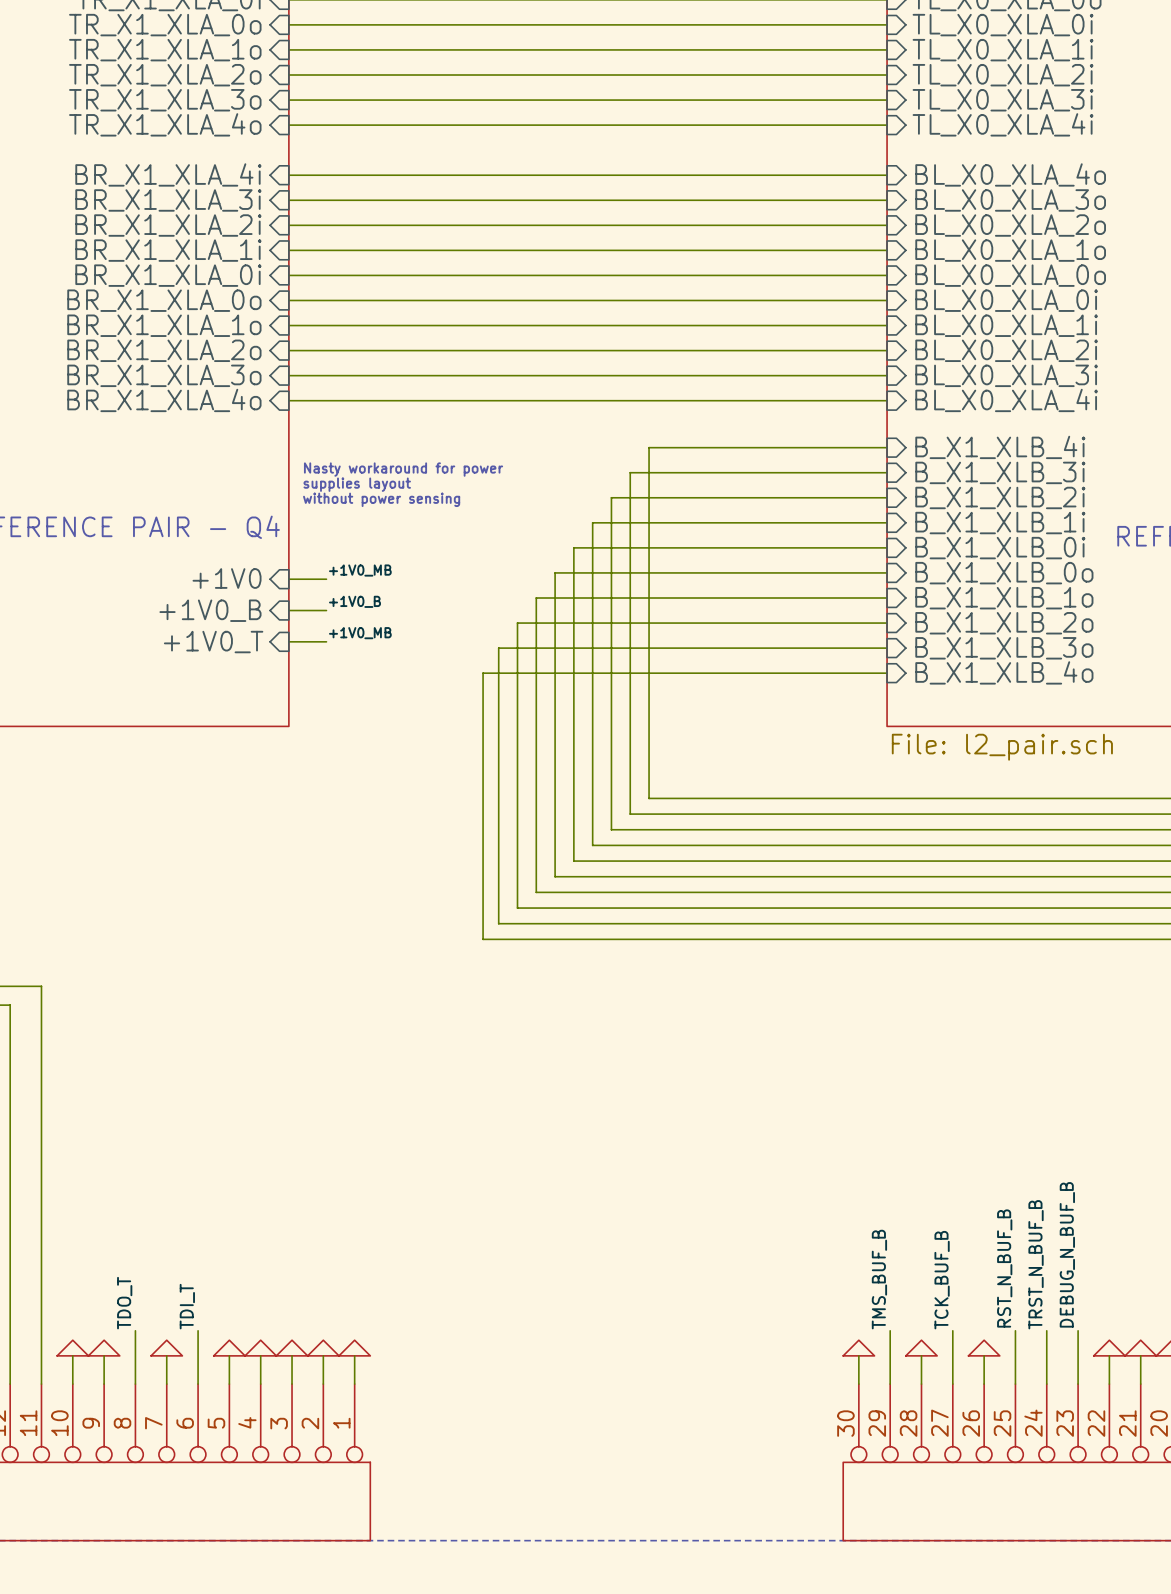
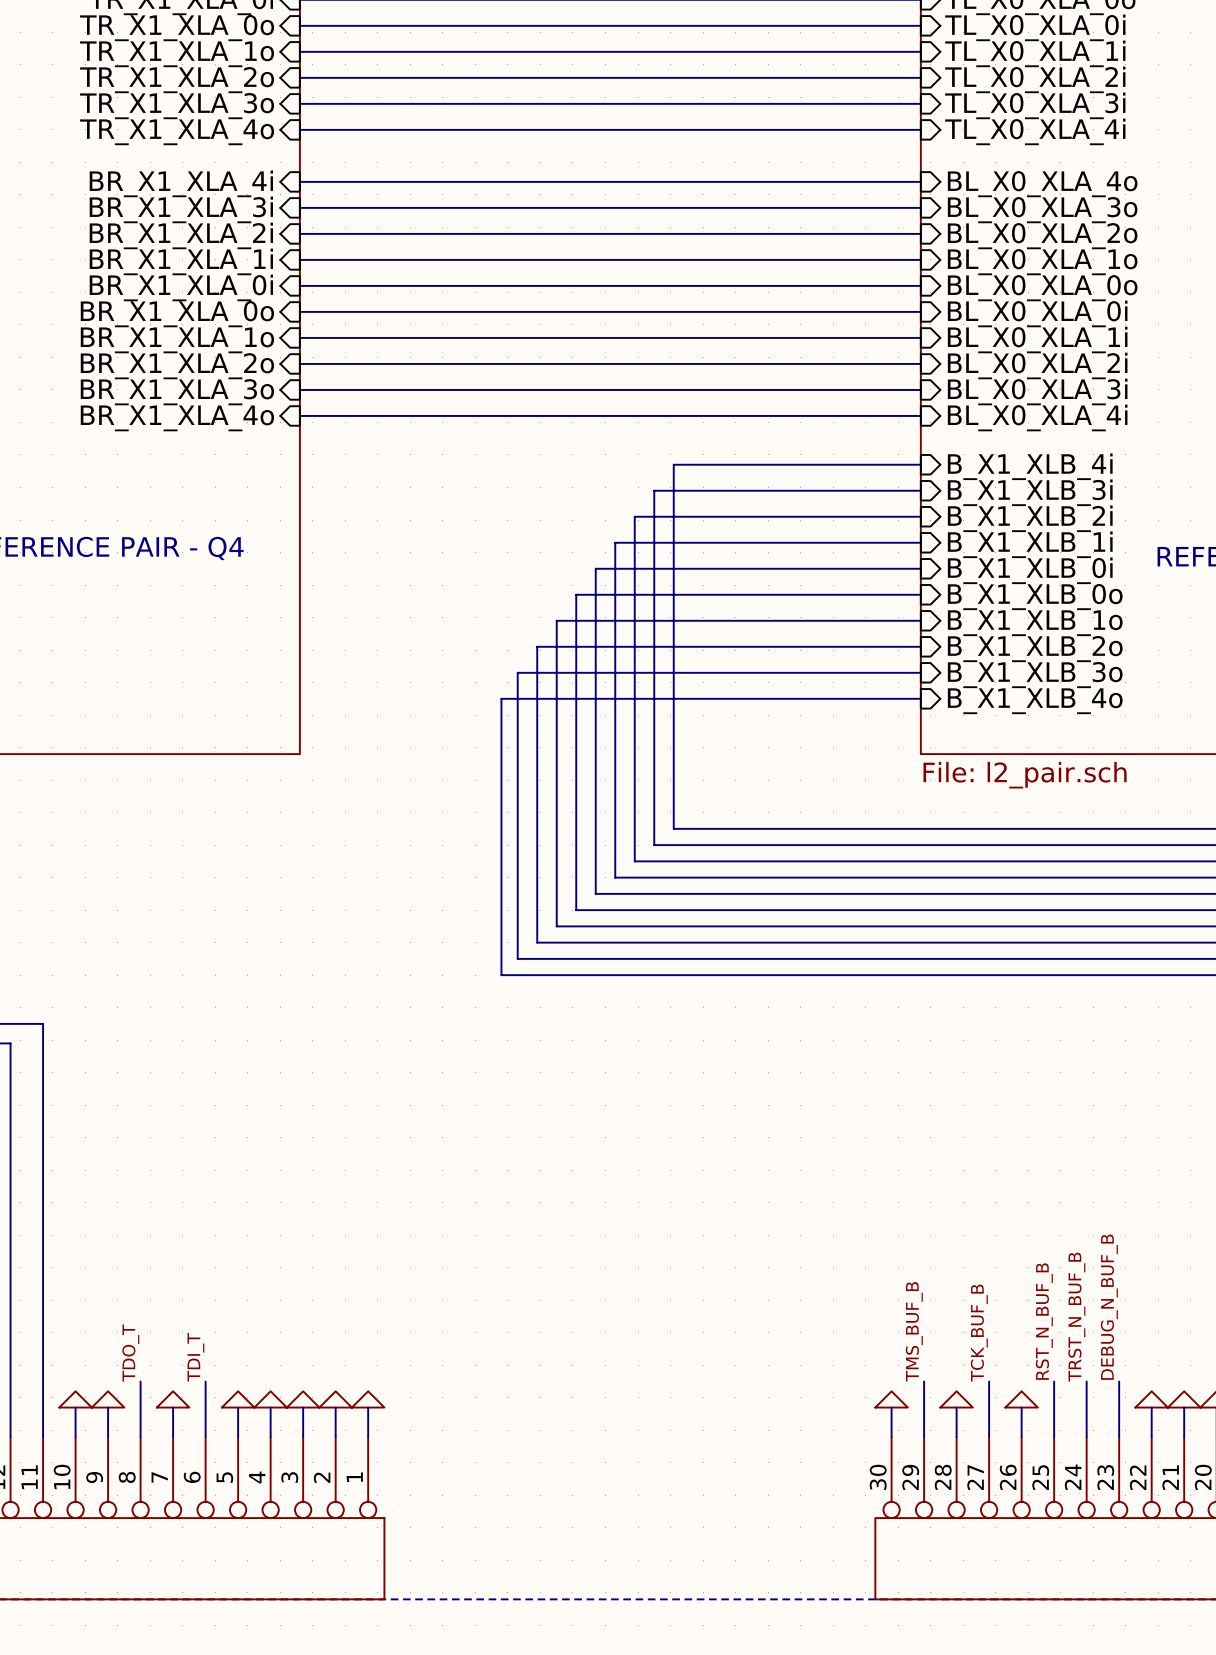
text: Nasty workaround for power (403, 469) -> none
text: supplies layout (357, 484) -> none
text: without power sensing (381, 499) -> none
label: +1V0_MB (360, 570) -> none
sheet pin: +1V0 (227, 578) -> none
wire: (288, 579) (326, 579) -> none
label: +1V0_B (354, 601) -> none
sheet pin: +1V0_B (210, 610) -> none
wire: (288, 610) (326, 610) -> none
label: +1V0_MB (360, 633) -> none
wire: (288, 641) (326, 641) -> none
sheet pin: +1V0_T (213, 642) -> none

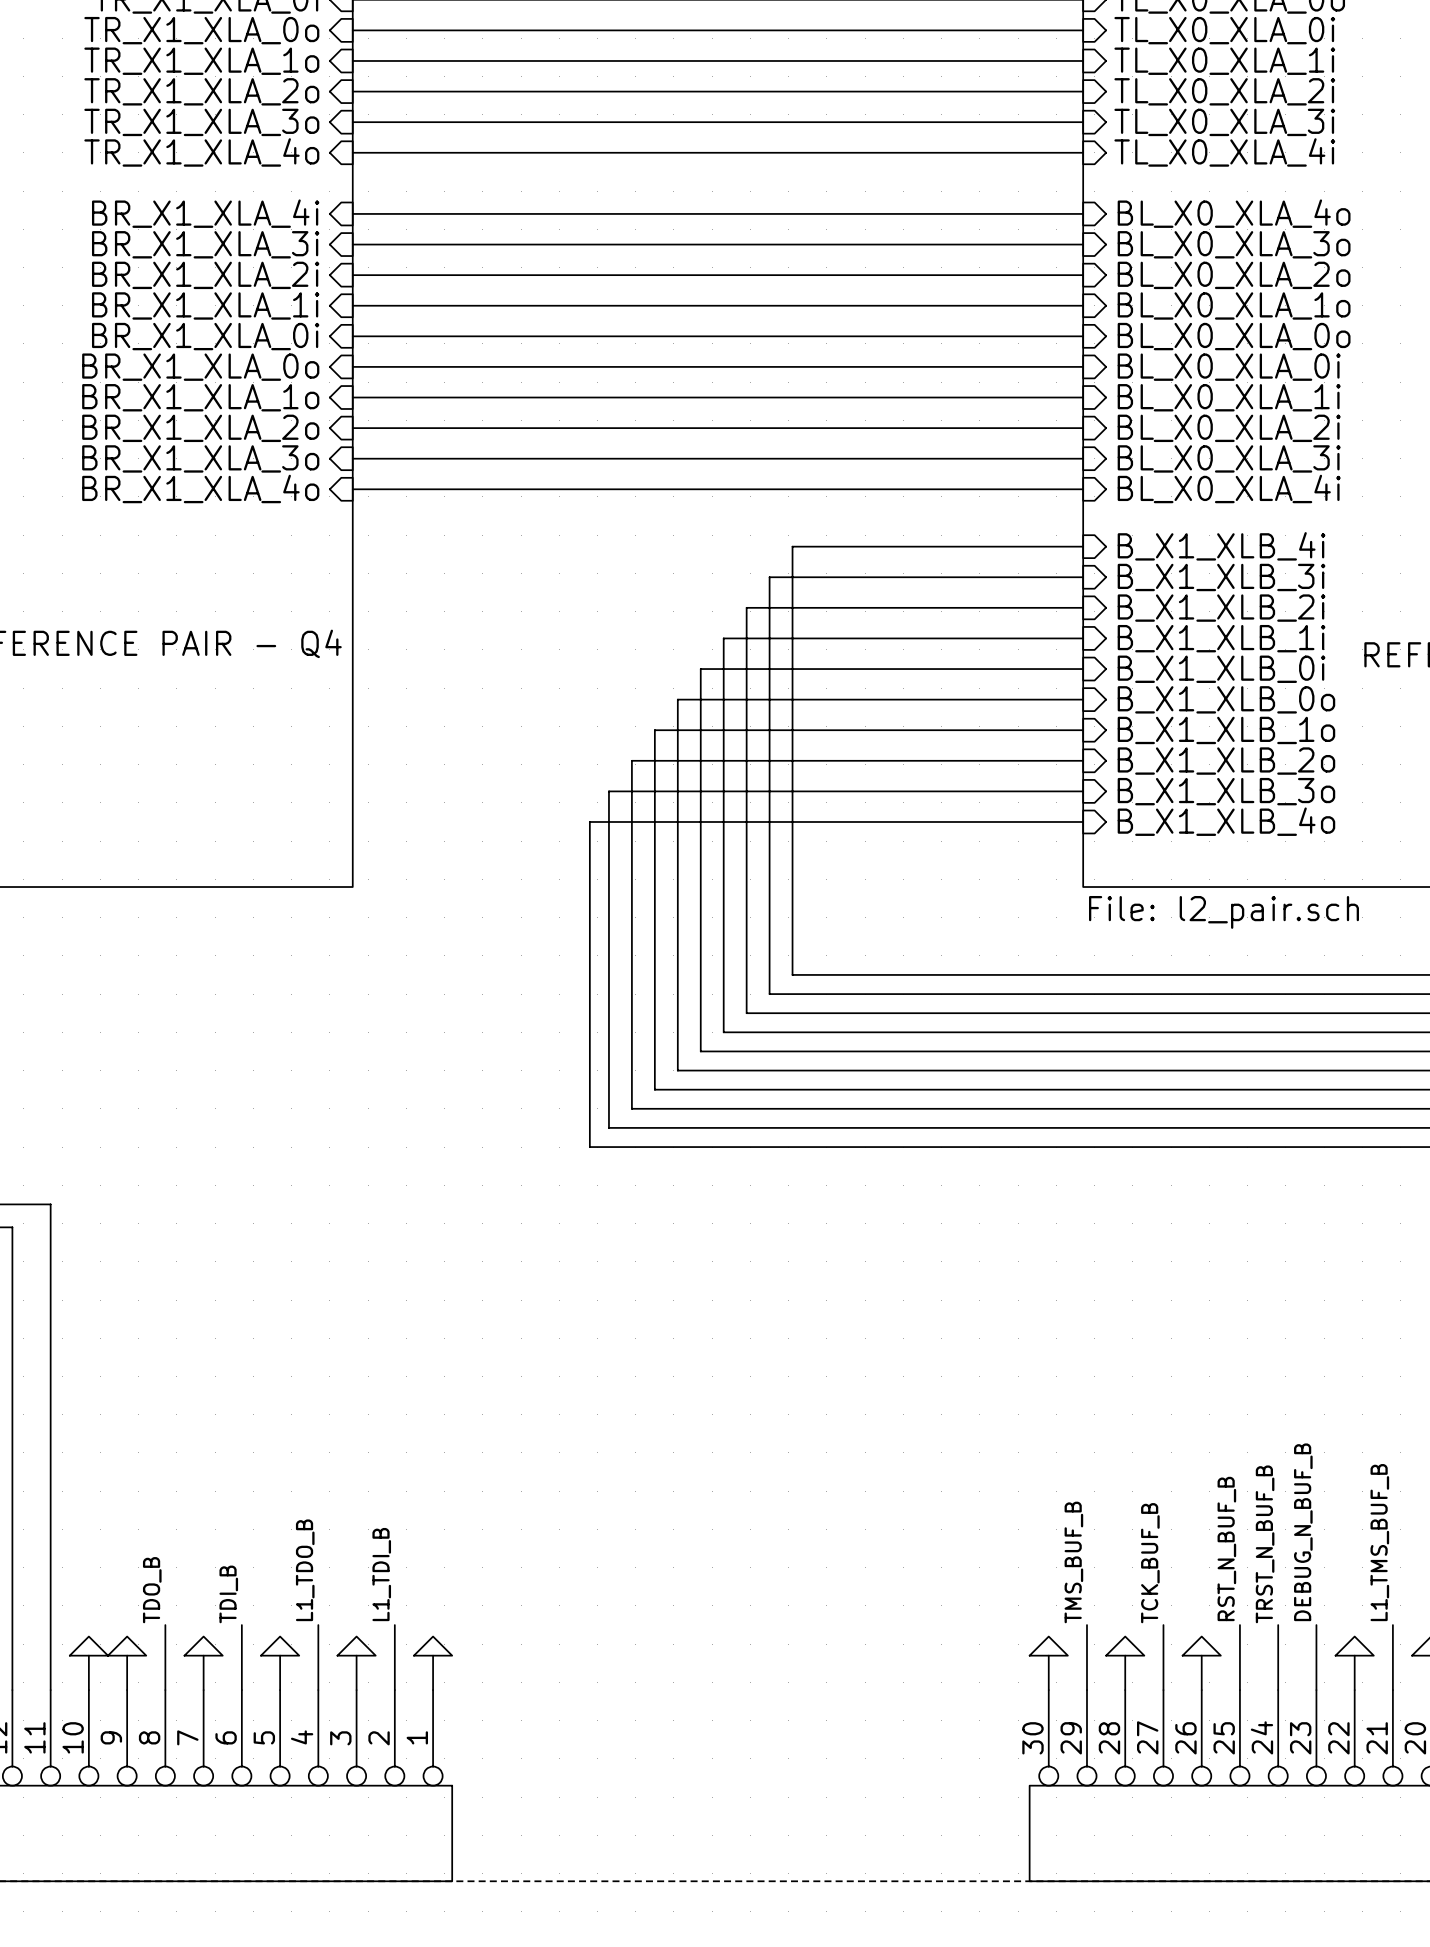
label: none -> L1_TMS_BUF_B (1379, 1542)
label: none -> L1_TDO_B (305, 1570)
label: none -> L1_TDI_B (381, 1574)
label: TDO_T (130, 1353) -> TDO_B (152, 1590)
label: TDI_T (195, 1357) -> TDI_B (228, 1594)
wire: none -> (318, 1625) (318, 1655)
wire: none -> (394, 1625) (394, 1655)
wire: none -> (1392, 1625) (1392, 1655)
power symbol: (270, 1399) -> none
power symbol: (335, 1399) -> none
power symbol: (1184, 1399) -> none

